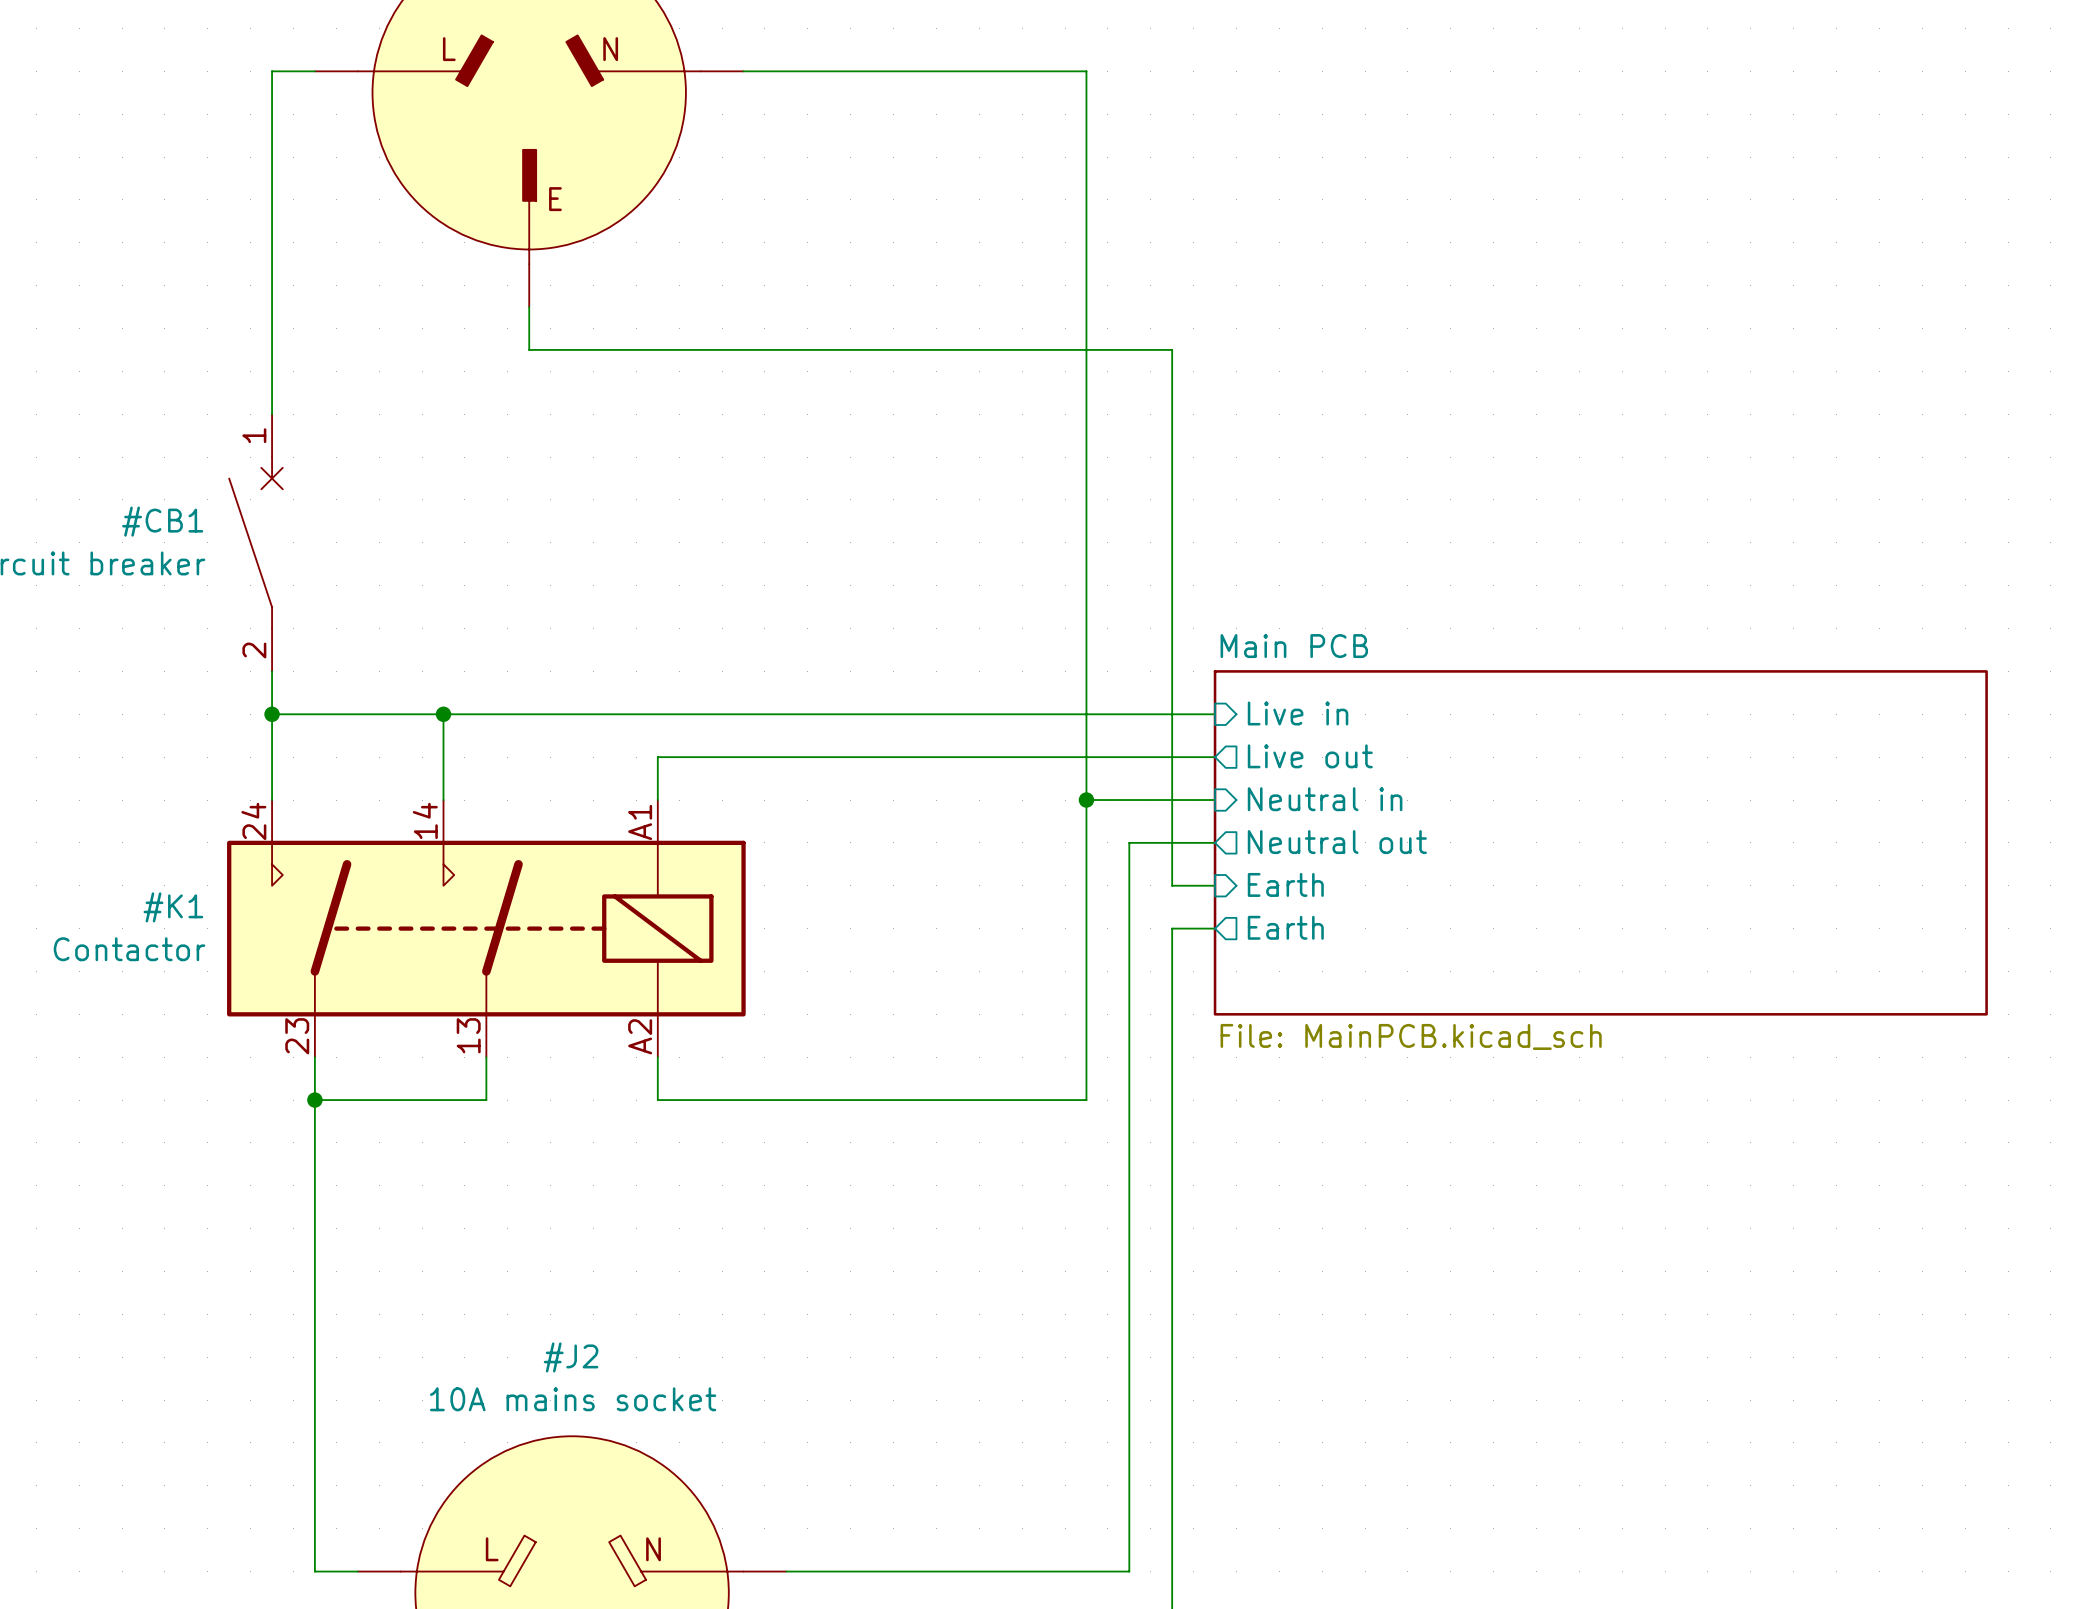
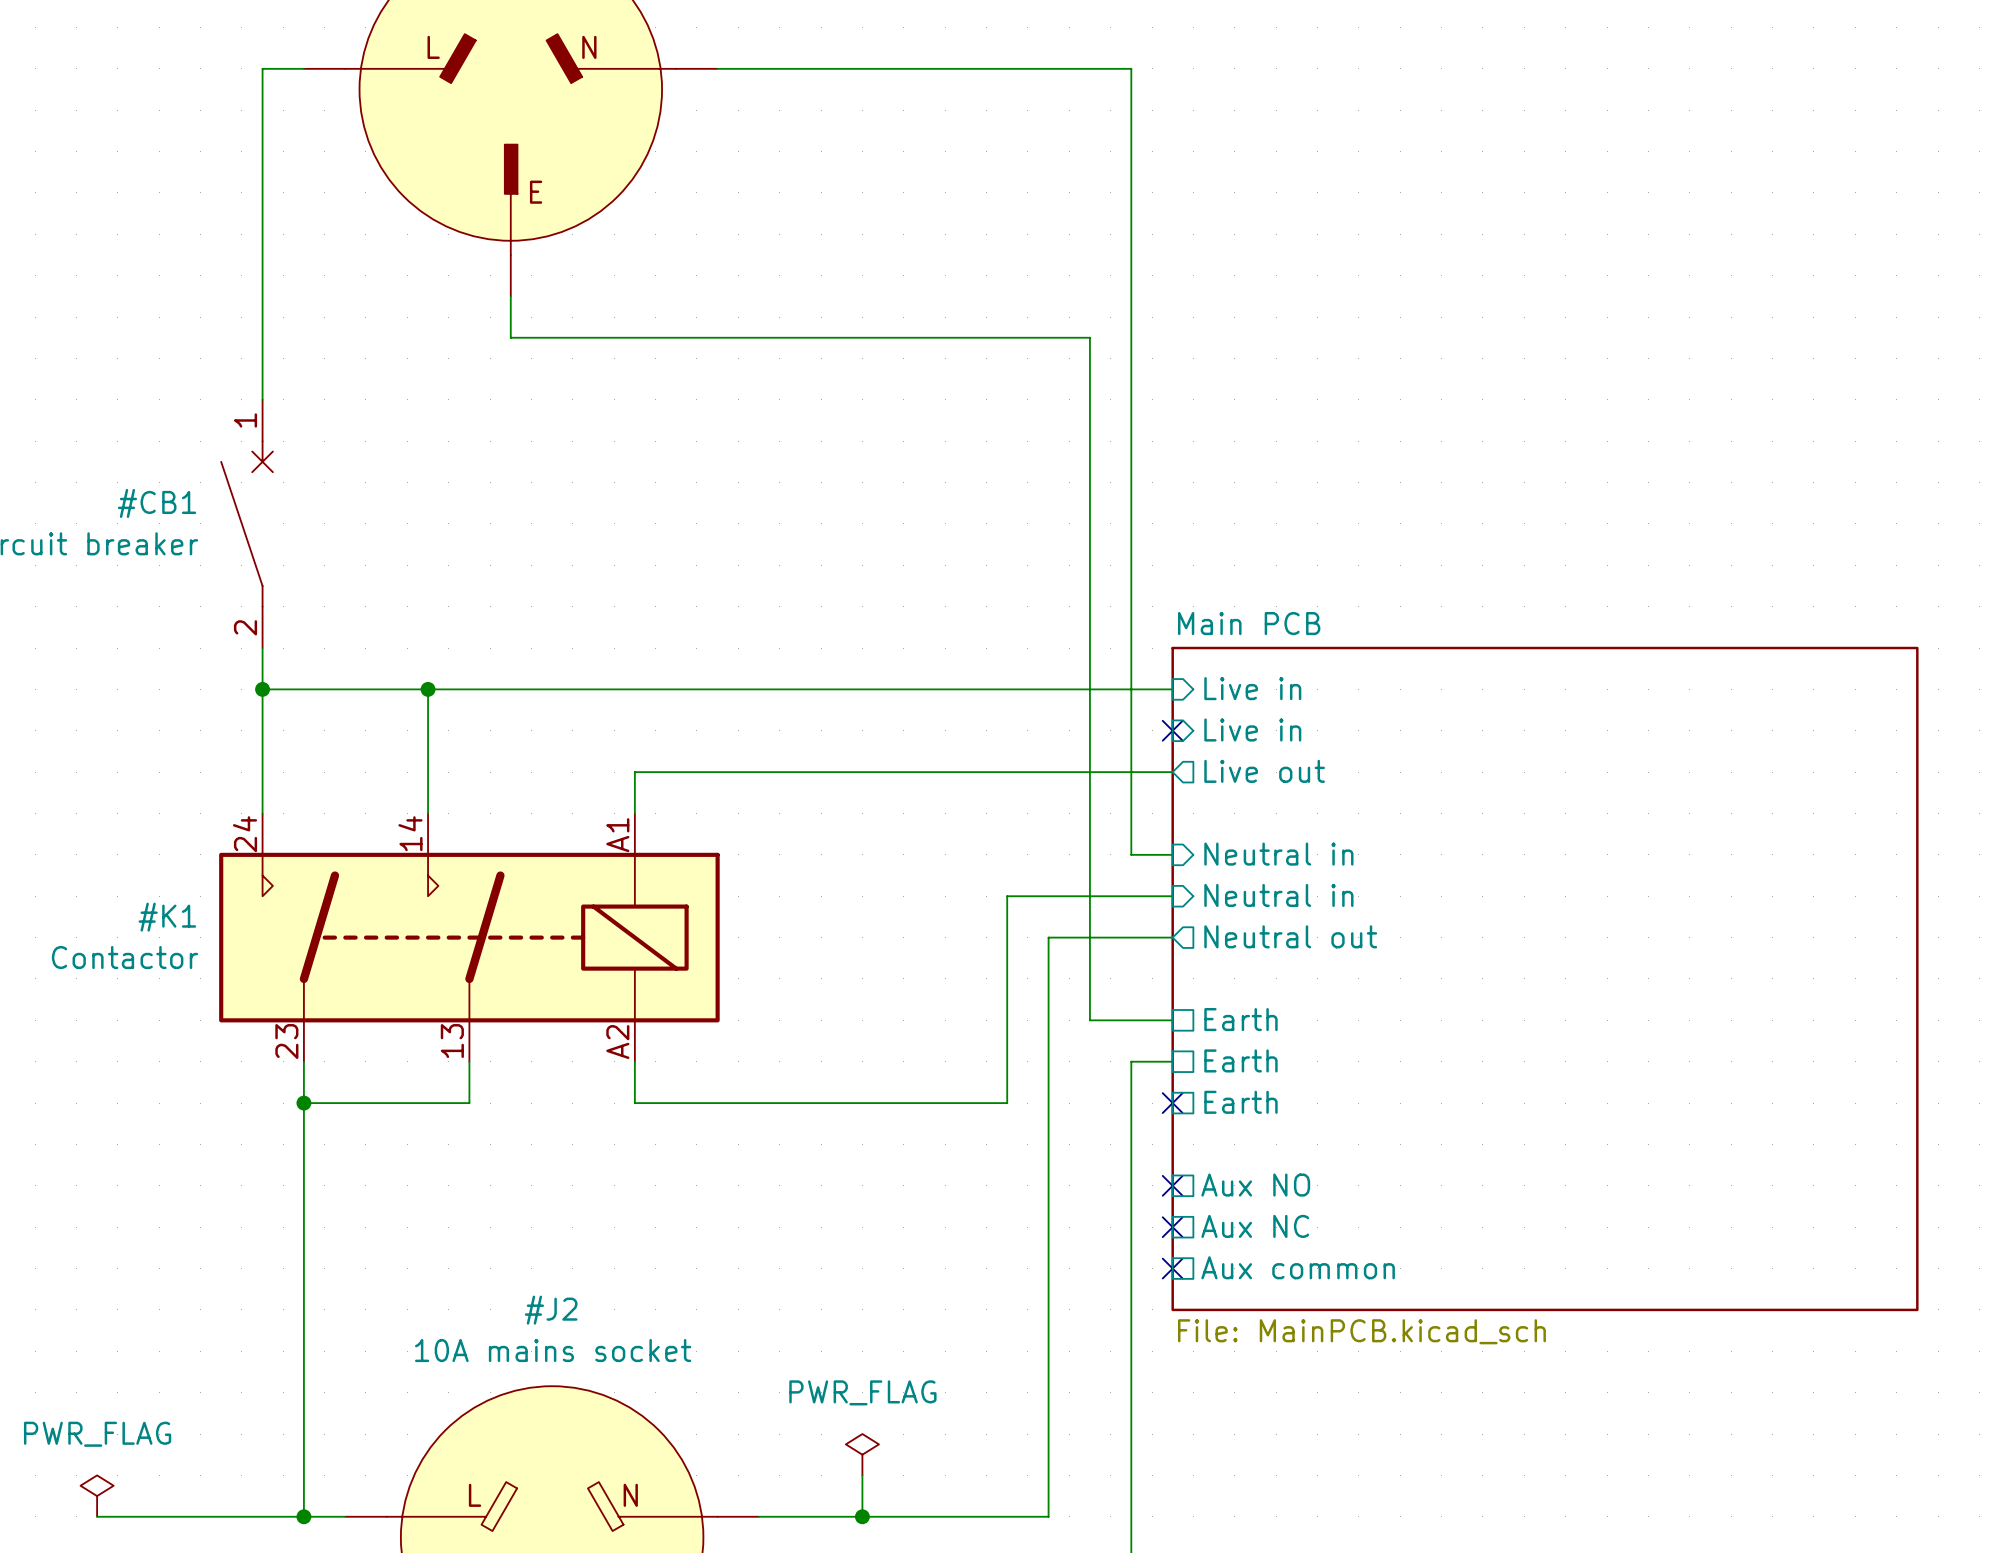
wire: (1086, 71) (1086, 971) -> (1172, 937) (1048, 937)
wire: (1129, 349) (1172, 349) -> (1048, 68) (1131, 68) (1131, 337)
sheet pin shape: output (1310, 756) -> input (1252, 729)
sheet pin: Live out (1310, 756) -> Live in (1252, 729)
wire: (1215, 757) (657, 757) (657, 800) -> none
no-connect mark: none -> (1172, 730)
sheet pin shape: input (1325, 799) -> output (1264, 771)
sheet pin: Neutral in (1325, 799) -> Live out (1264, 771)
wire: none -> (1048, 772) (634, 772) (634, 813)
junction: (1086, 800) -> none
wire: (1129, 842) (1215, 842) -> (1089, 813) (1089, 337)
sheet pin position: Neutral out (1337, 842) -> Neutral out (1290, 936)
sheet Main PCB: File: MainPCB.kicad_sch (1600, 842) -> none
sheet pin: Earth (1285, 884) -> Neutral in (1278, 854)
sheet pin shape: output (1285, 927) -> input (1278, 895)
sheet pin: Earth (1285, 927) -> Neutral in (1278, 895)
#K1 position: Contactor (486, 928) -> Contactor (469, 937)
wire: (1172, 928) (1172, 1100) -> (1172, 1061) (1131, 1061)
wire: none -> (1131, 896) (1007, 896) (1007, 1103) (634, 1103) (634, 1061)
sheet Main PCB: none -> File: MainPCB.kicad_sch (1545, 978)
sheet pin: none -> Earth (1240, 1019)
wire: (314, 1057) (314, 1100) (486, 1100) (486, 1057) -> none
wire: (657, 1057) (657, 1100) (1086, 1100) -> none
wire: (1129, 1057) (1129, 1571) (1086, 1571) -> (1048, 1061) (1048, 1516)
wire: none -> (1089, 1020) (1172, 1020)
sheet pin: none -> Earth (1240, 1060)
junction position: (314, 1100) -> (303, 1103)
wire: none -> (469, 1061) (469, 1103) (303, 1103)
no-connect mark: none -> (1172, 1103)
sheet pin: none -> Earth (1240, 1102)
sheet pin: none -> Aux NO (1255, 1185)
no-connect mark: none -> (1172, 1185)
sheet pin: none -> Aux NC (1255, 1226)
no-connect mark: none -> (1172, 1227)
sheet pin: none -> Aux common (1298, 1267)
no-connect mark: none -> (1172, 1268)
power symbol: none -> PWR_FLAG (862, 1454)
wire: none -> (862, 1475) (862, 1516)
power symbol: none -> PWR_FLAG (97, 1496)
wire: none -> (97, 1516) (303, 1516)
junction: none -> (303, 1516)
junction: none -> (862, 1516)

